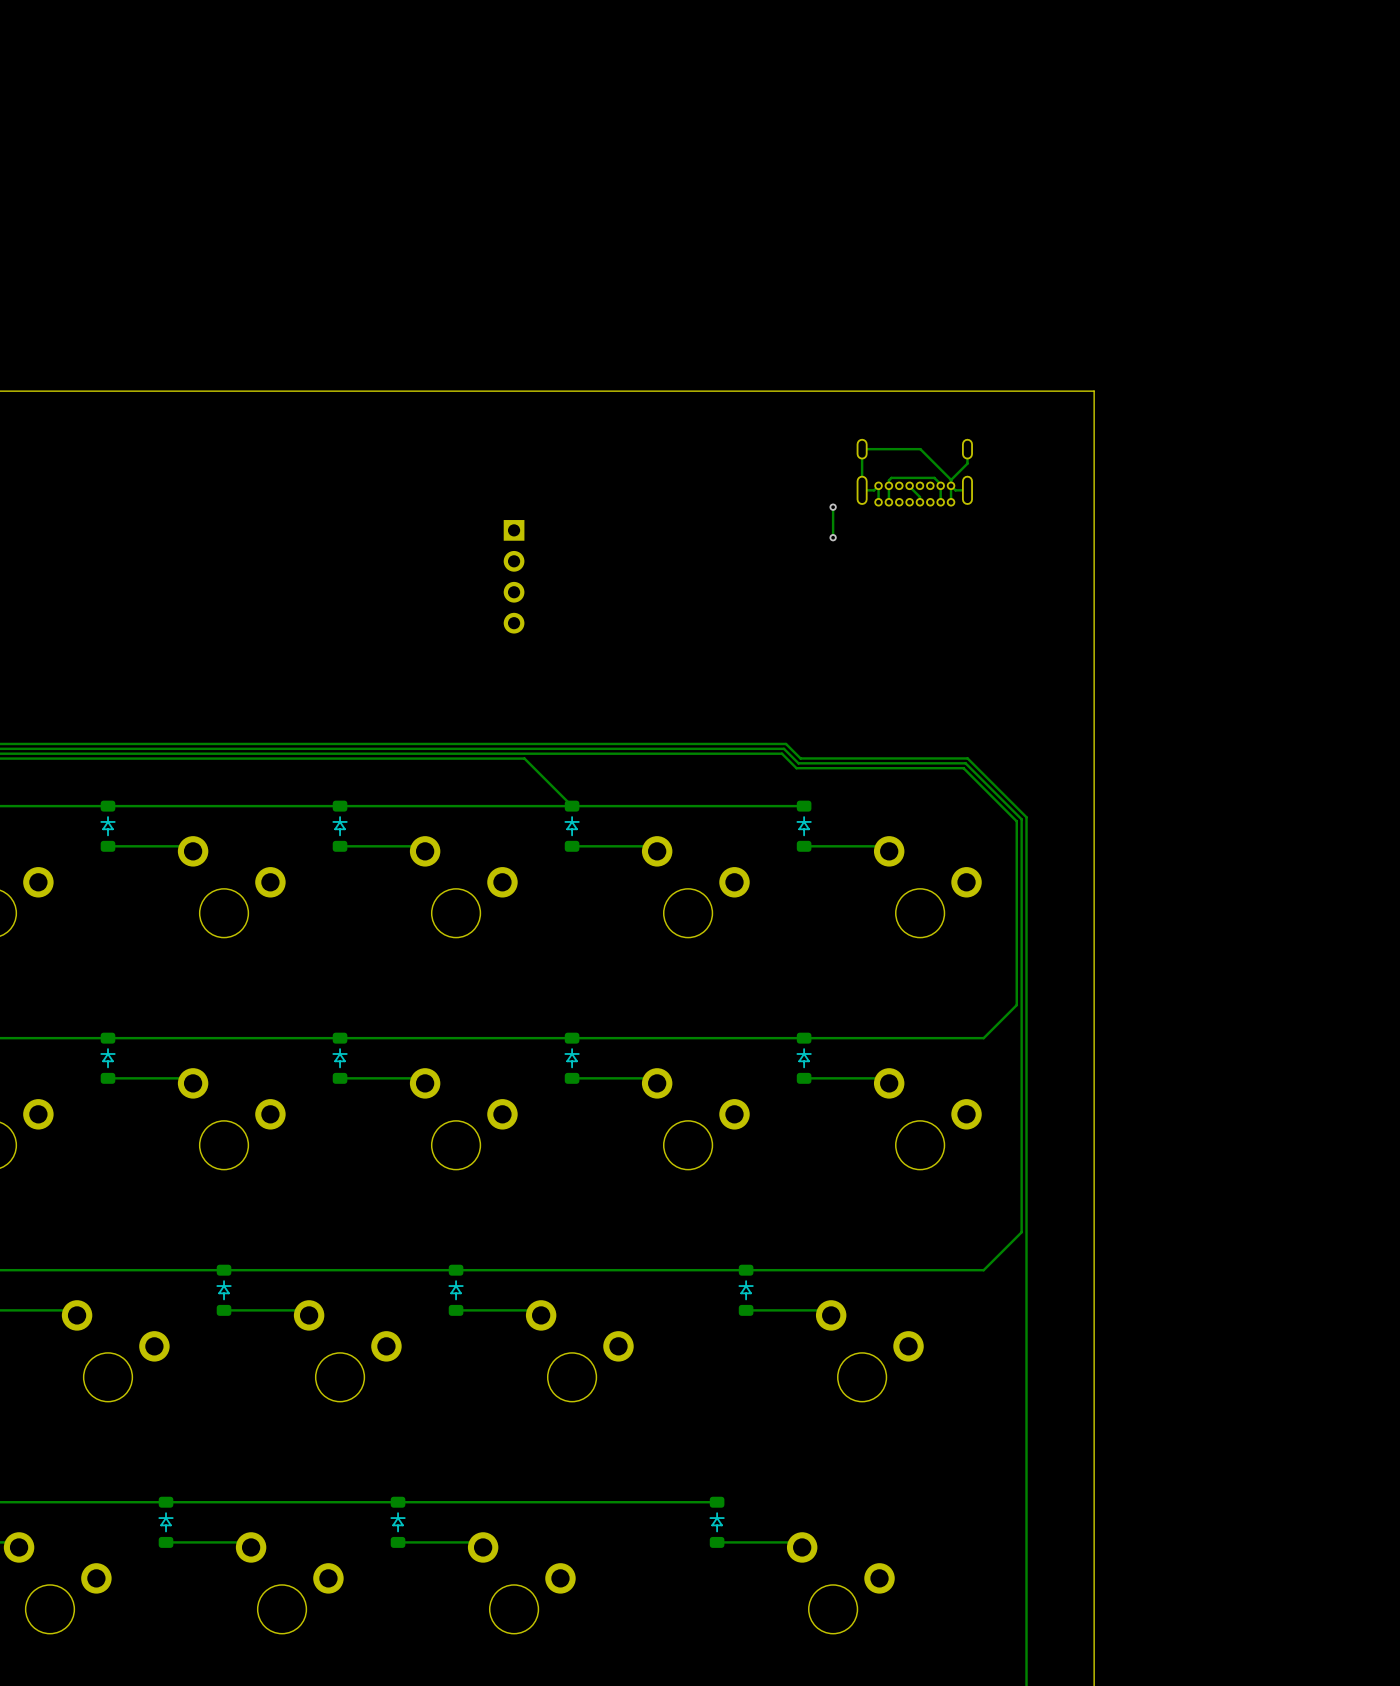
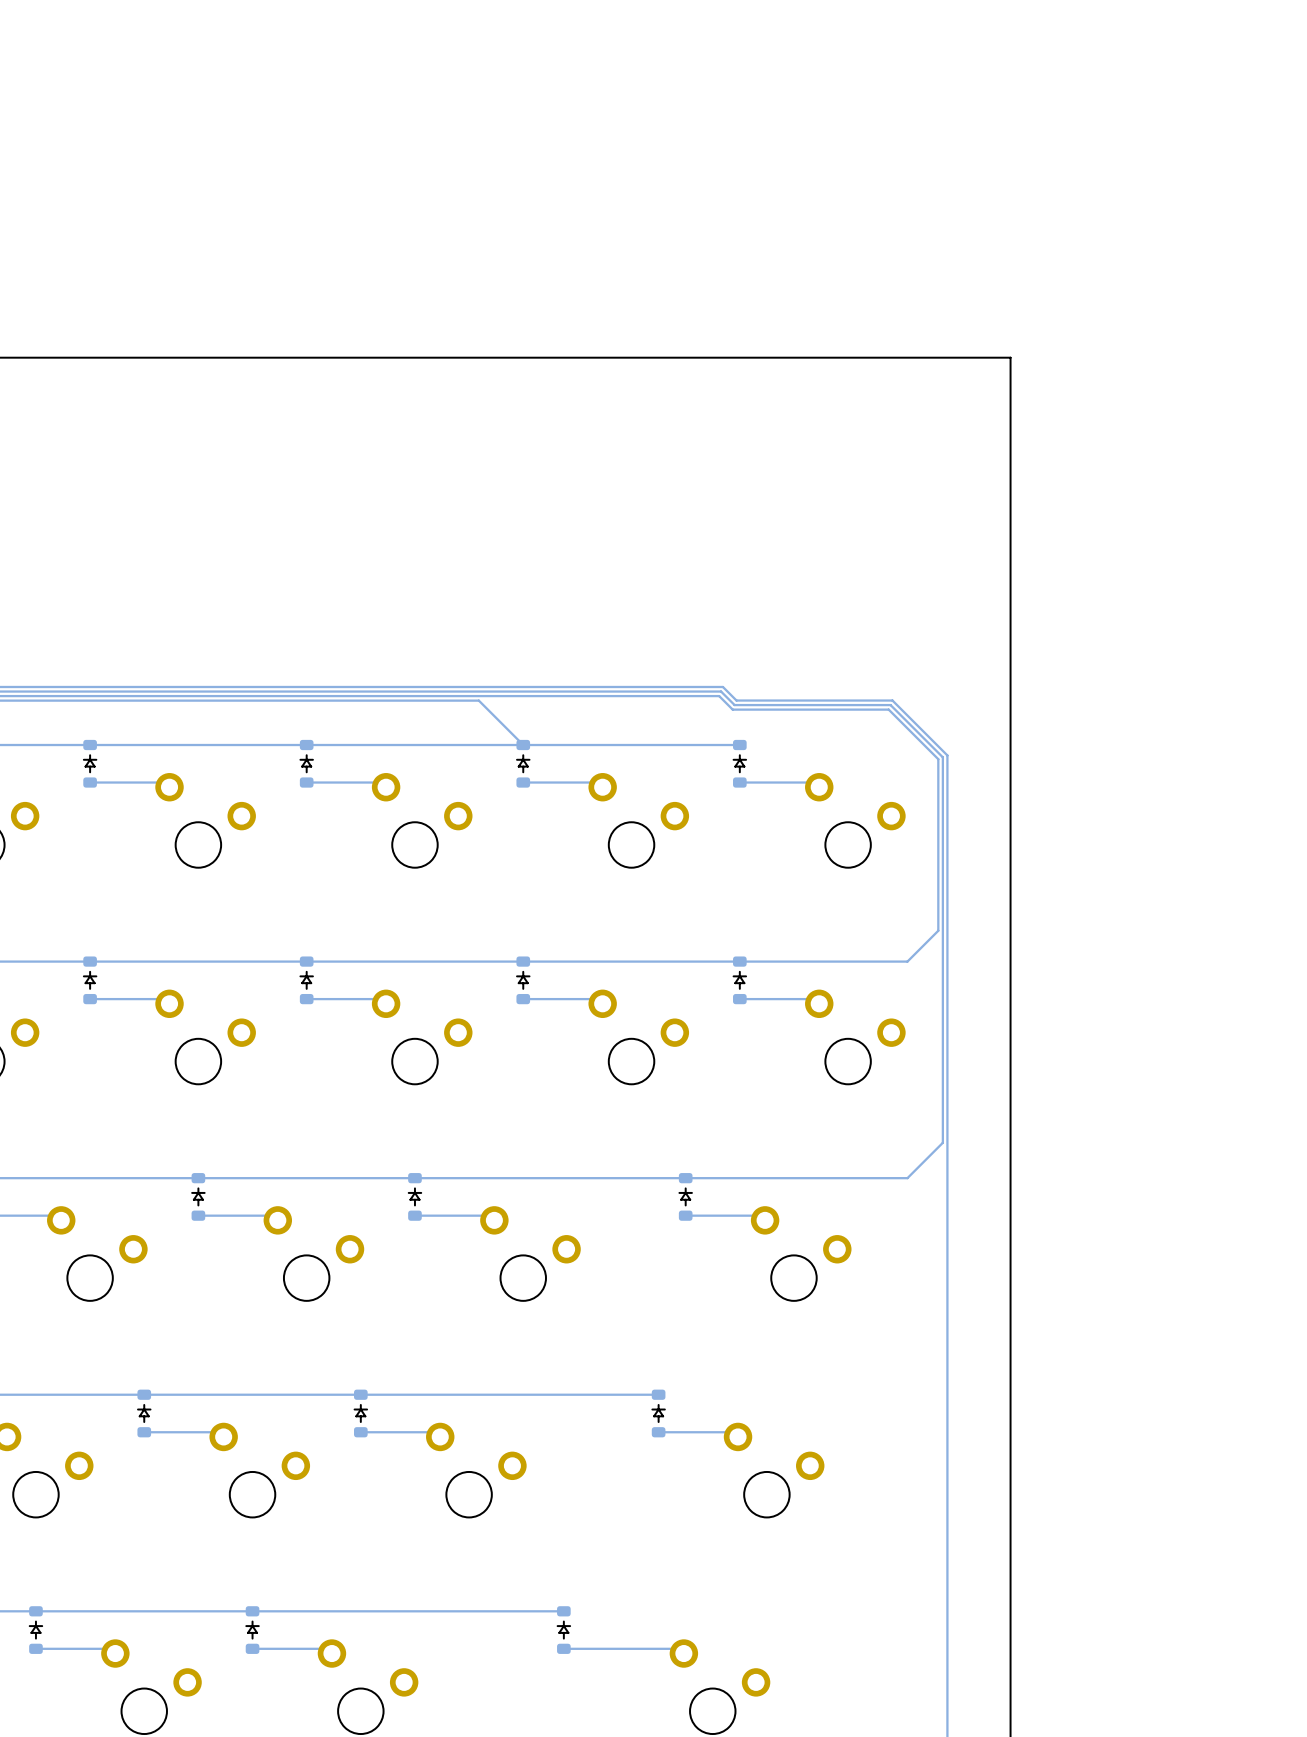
track: (967, 449) (967, 463) (951, 480) -> none
part: (914, 472) -> none
track: (909, 485) (919, 497) (919, 502) -> none
track: (951, 485) (955, 490) (967, 490) -> none
track: (940, 502) (940, 484) (934, 477) (891, 477) (888, 480) (888, 502) -> none
track: (951, 502) (951, 479) (920, 449) (862, 449) (862, 490) (874, 490) (878, 485) (878, 502) -> none
track: (833, 507) (833, 537) -> none
via: (833, 507) -> none
via: (833, 537) -> none
part: (514, 576) -> none

